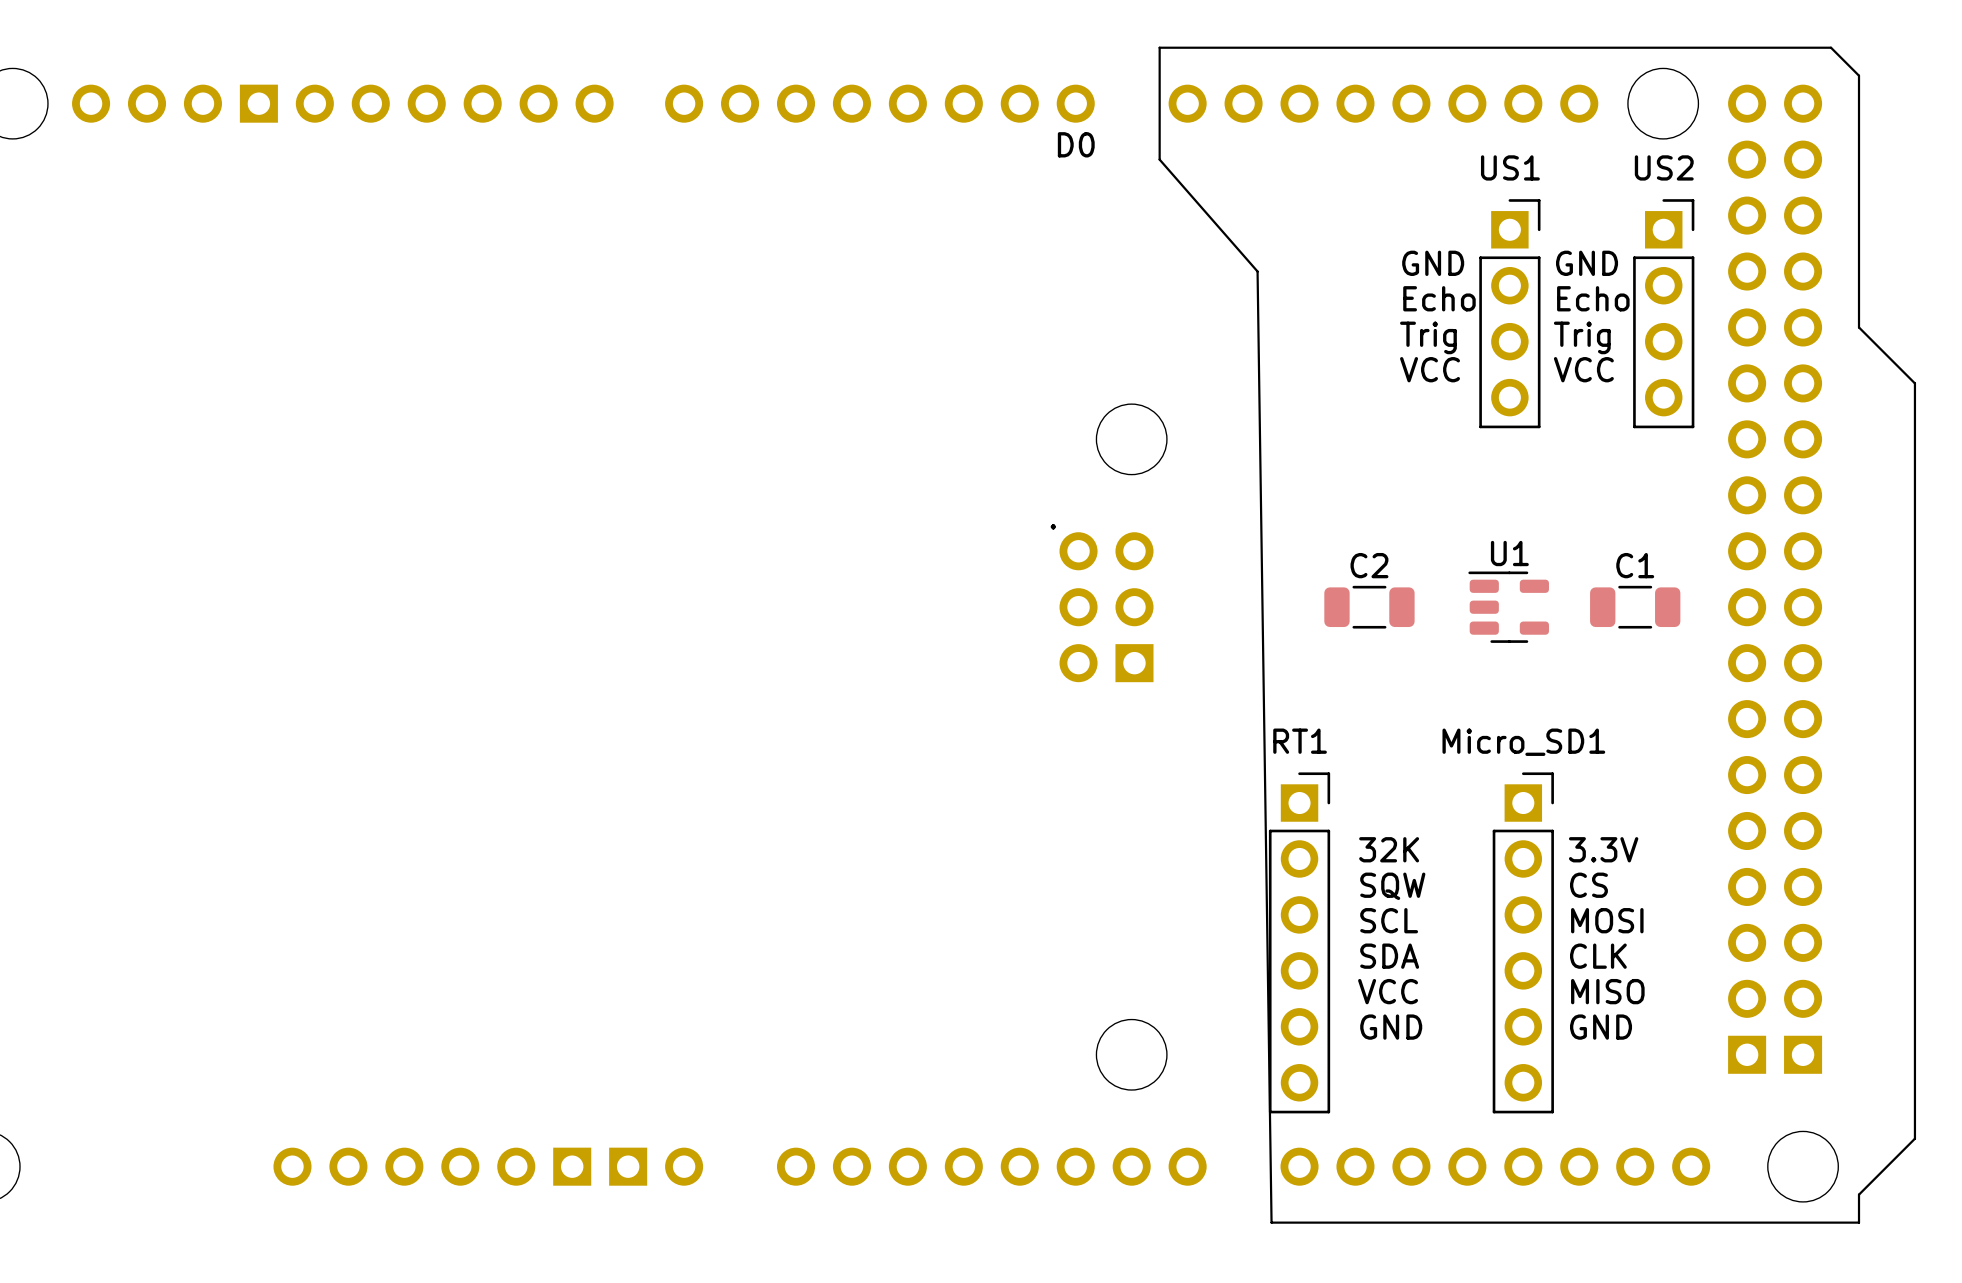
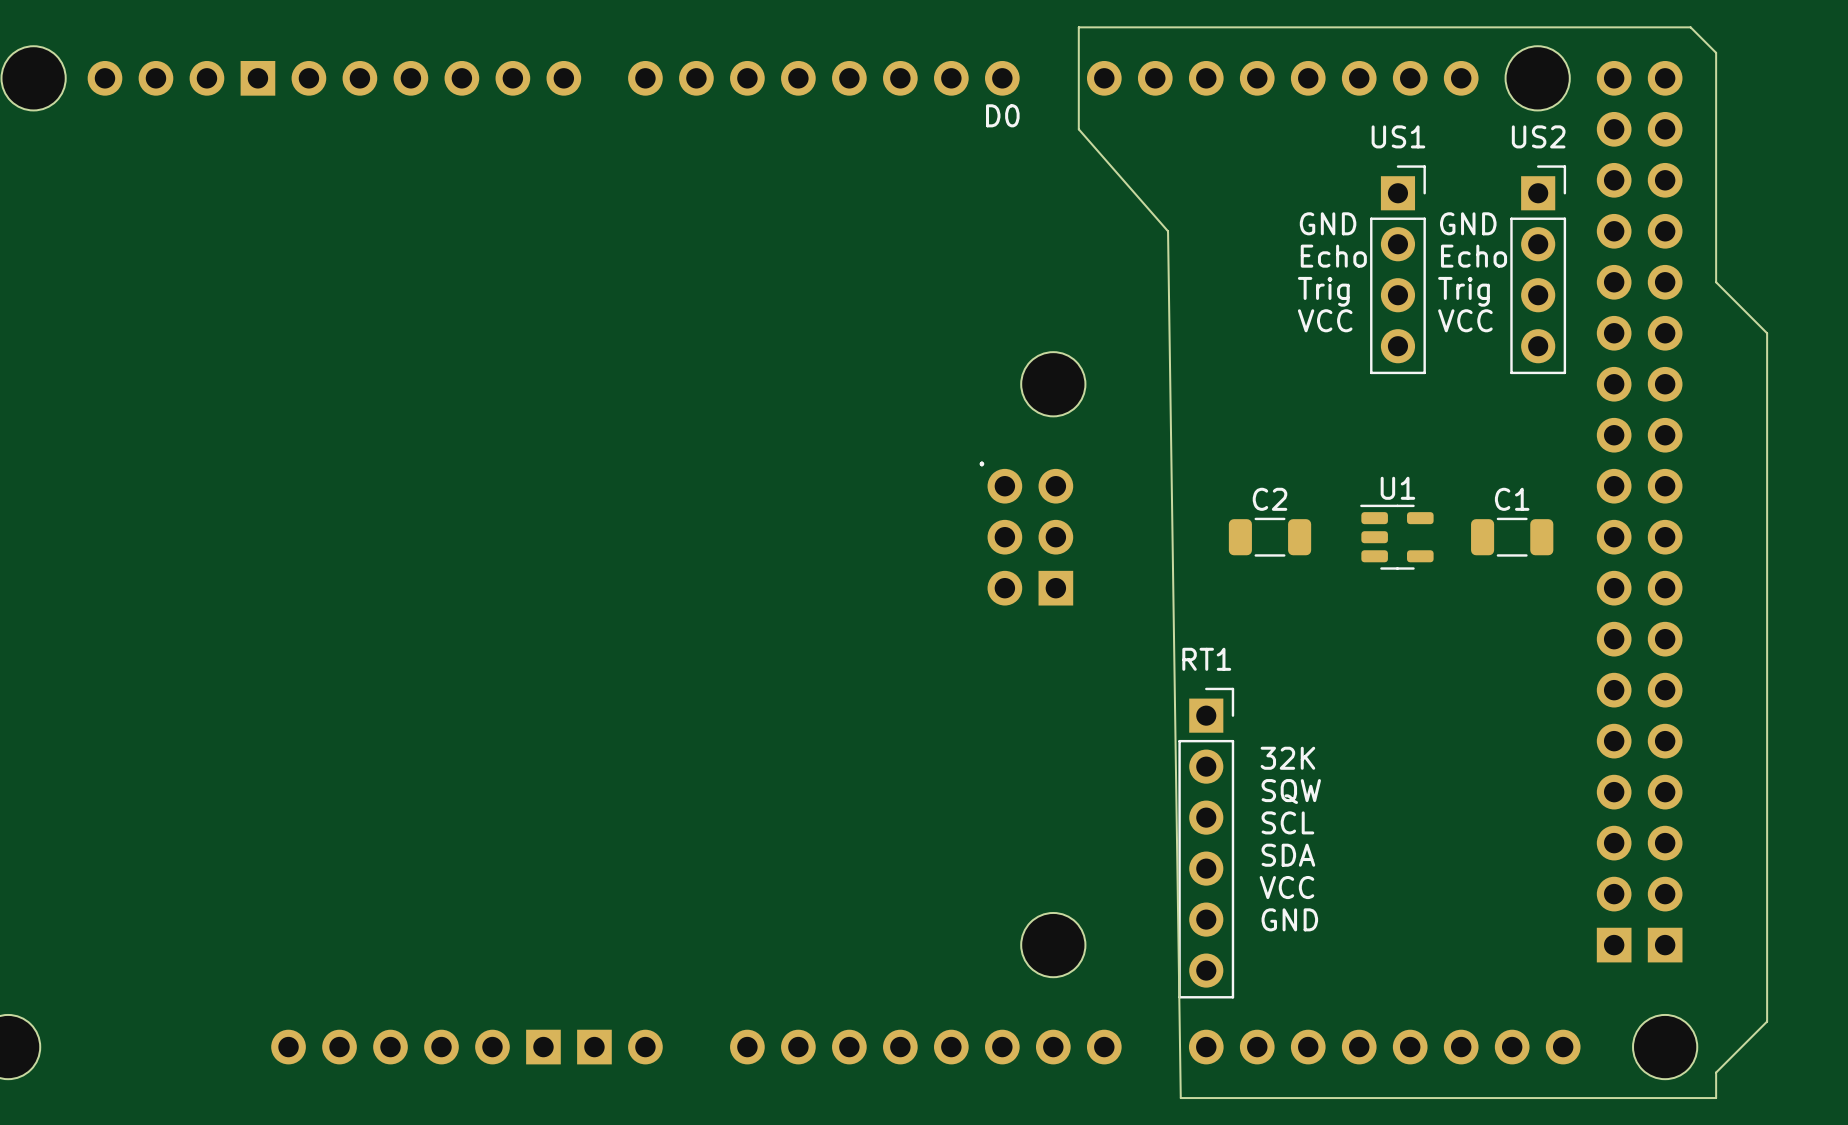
text: 3.3V (1603, 849) -> none
text: CS (1588, 885) -> none
text: MOSI (1607, 920) -> none
Micro_SD1: (1523, 942) -> none
text: CLK (1598, 956) -> none
text: MISO (1607, 991) -> none
text: GND (1601, 1027) -> none

